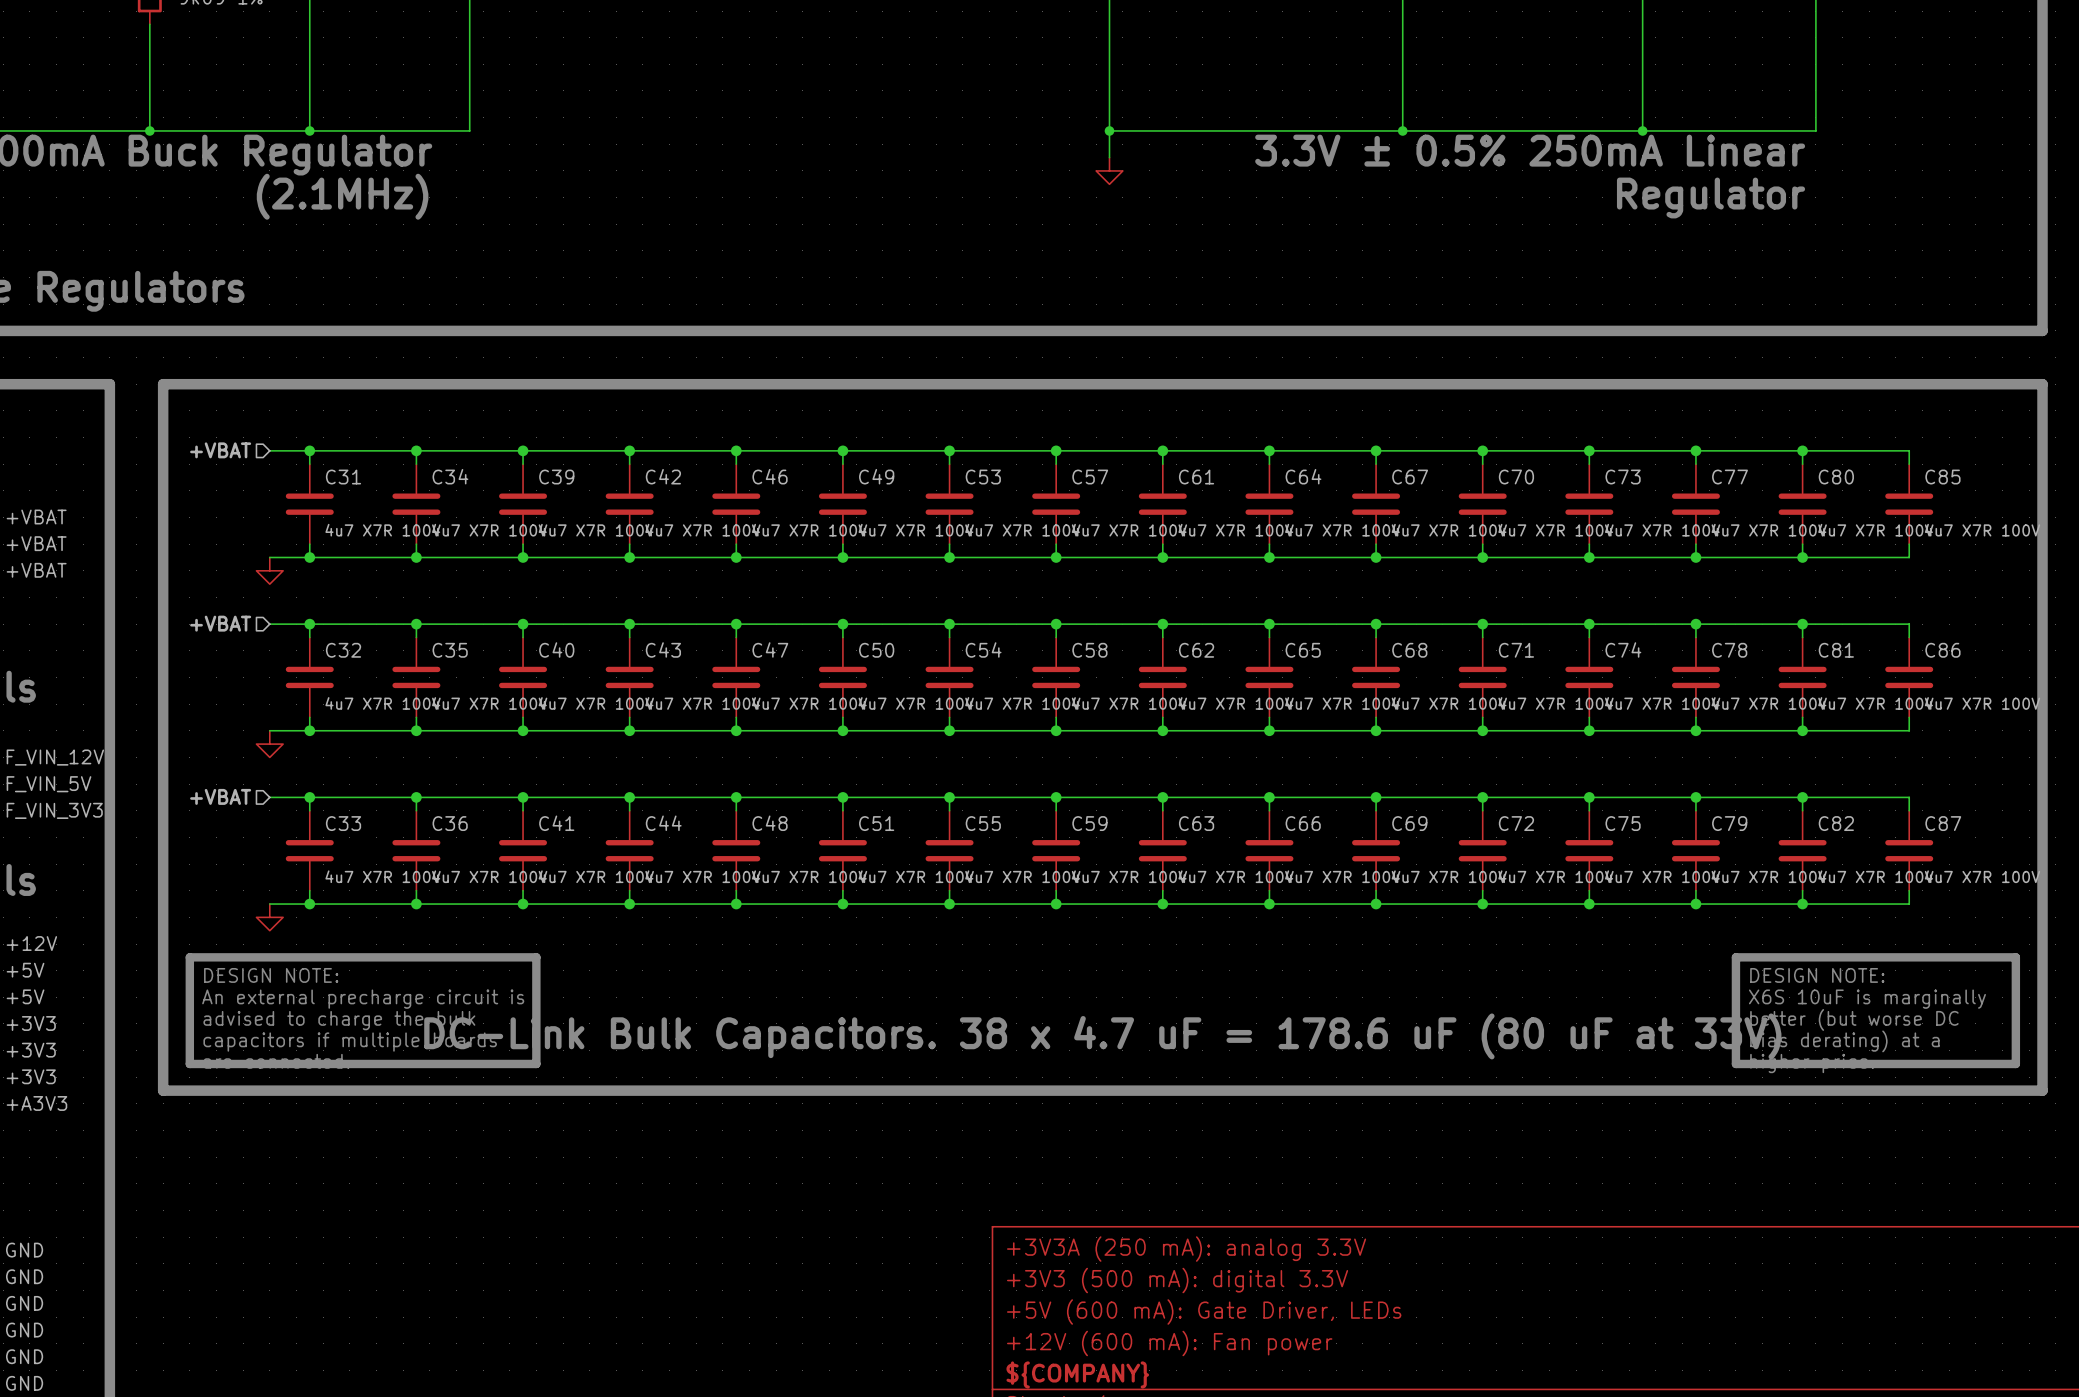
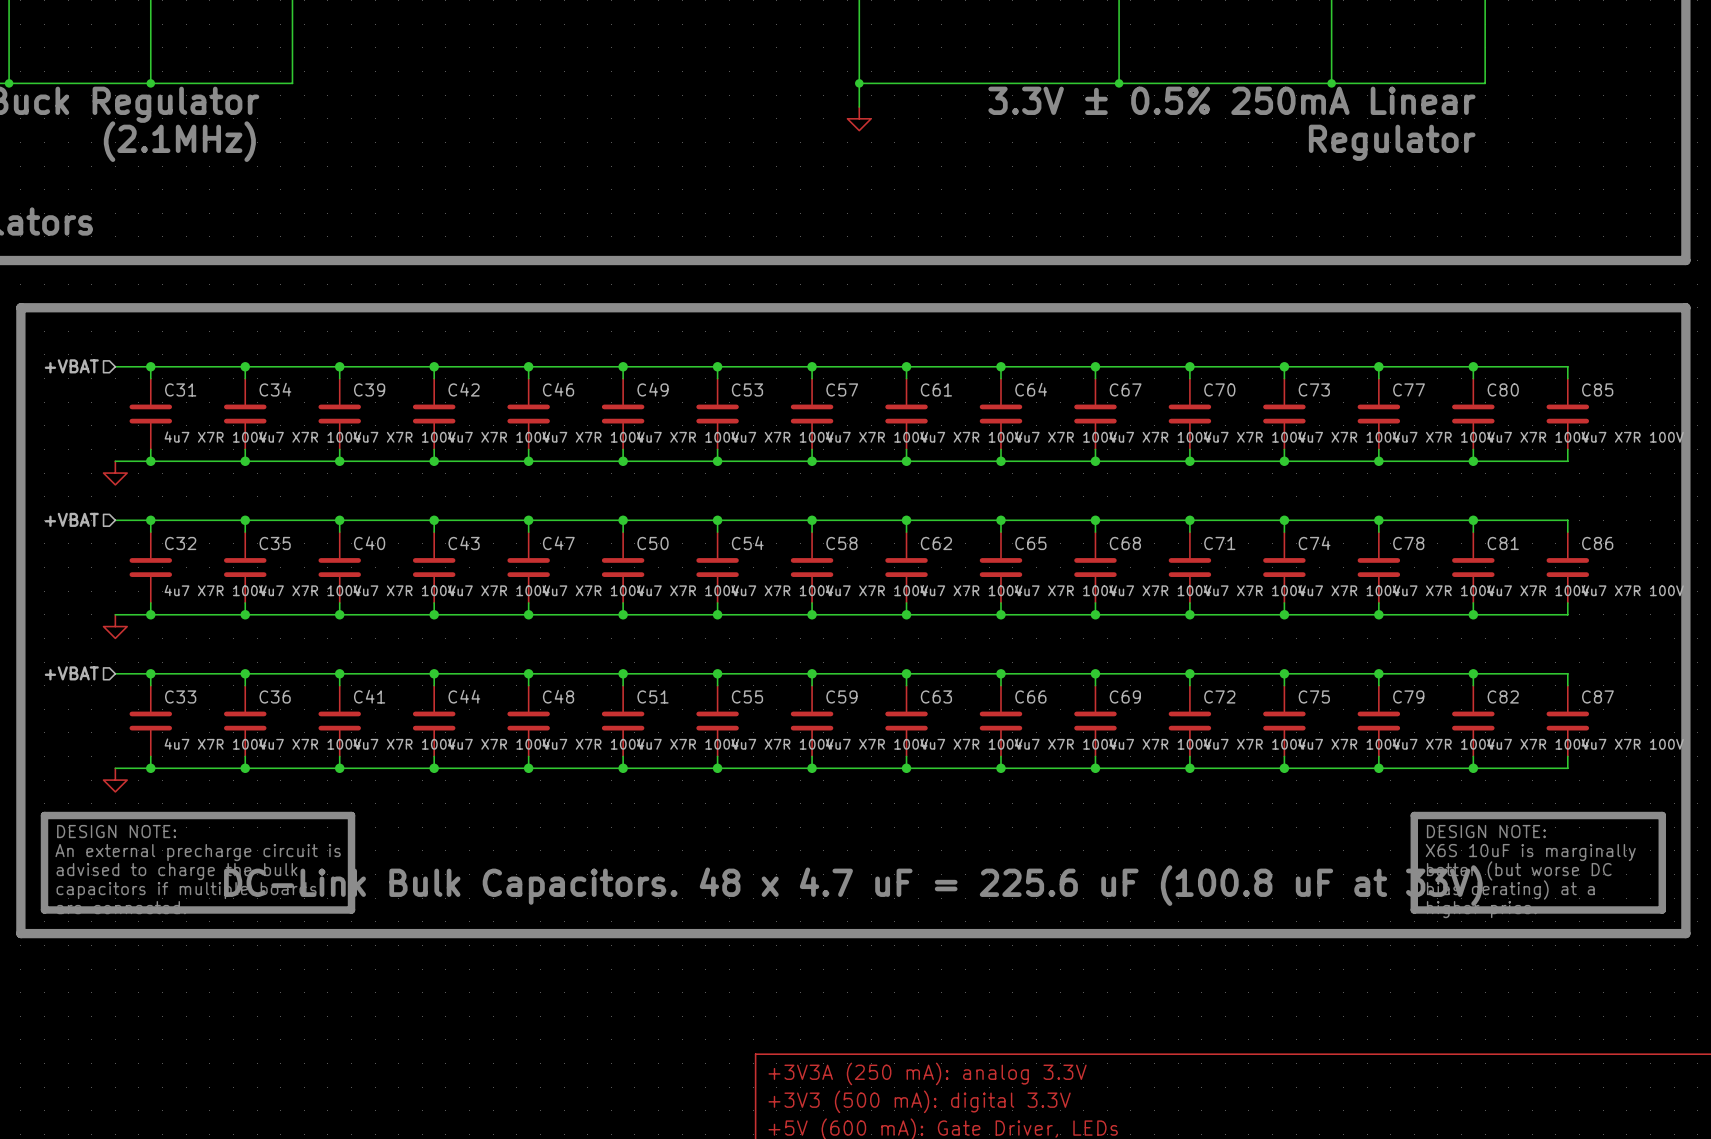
text: DC-Link Bulk Capacitors. 38 x 4.7 uF = 178.6 uF (80 uF at 33V) (1102, 1036) -> DC-Link Bulk Capacitors. 48 x 4.7 uF = 225.6 uF (100.8 uF at 33V) (853, 885)

